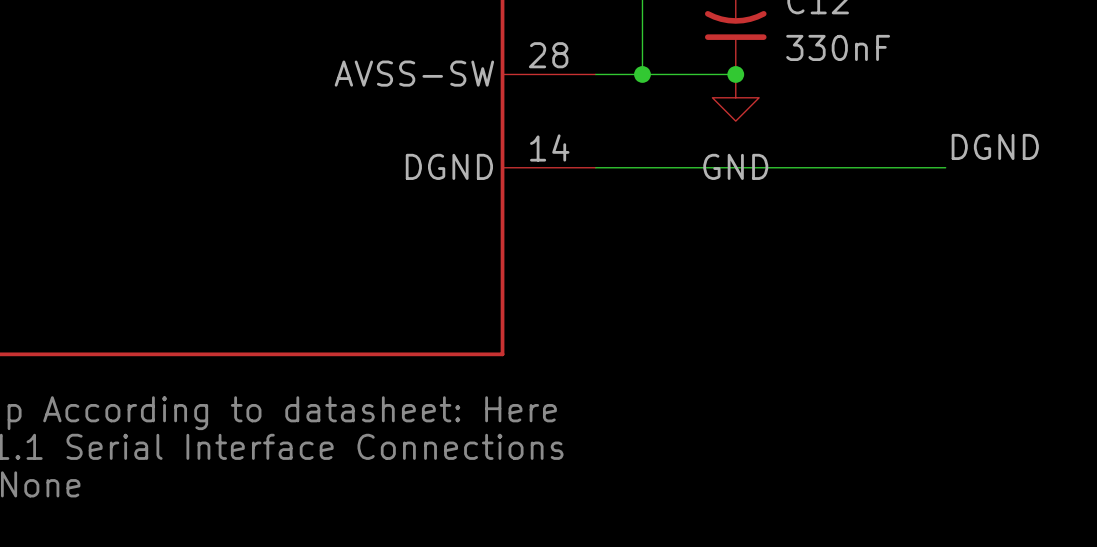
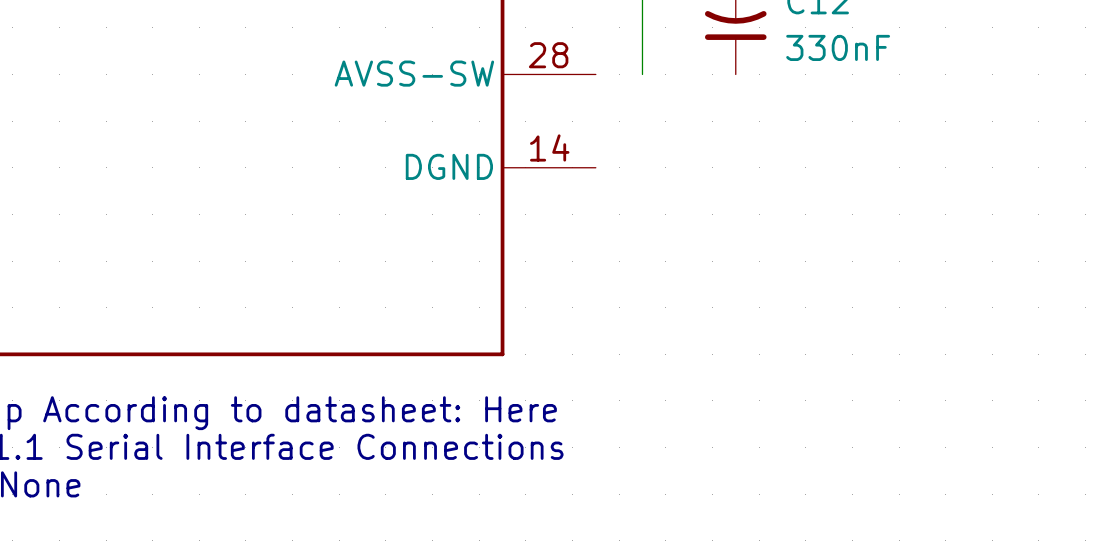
wire: (595, 74) (735, 74) -> none
junction: (642, 74) -> none
junction: (735, 74) -> none
power symbol: GND (735, 97) -> none
label: DGND (995, 146) -> none
wire: (595, 167) (945, 167) -> none

